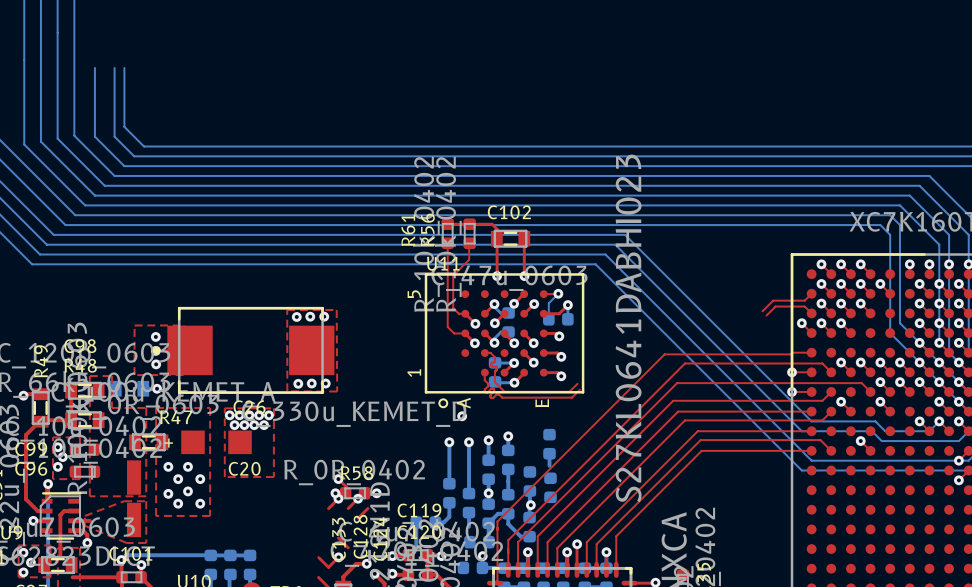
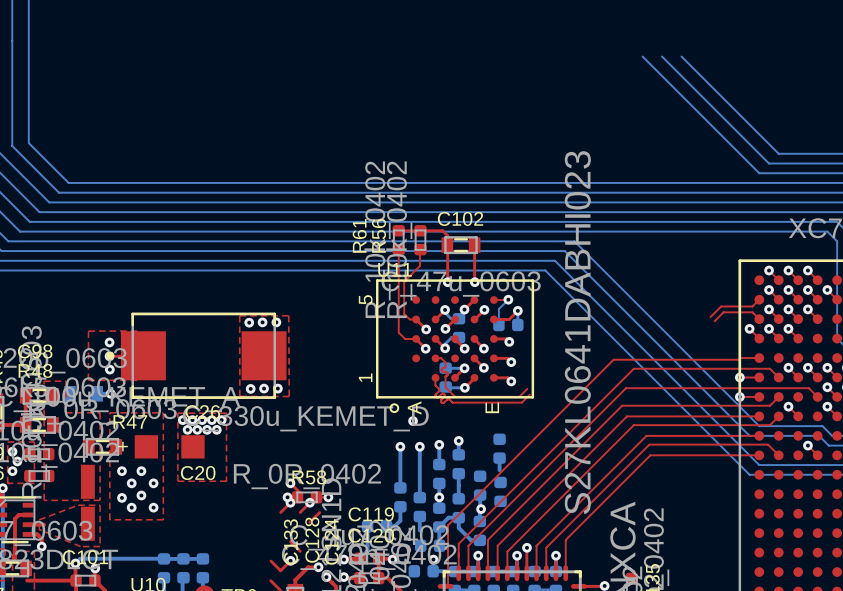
bottom track: (94, 67) (94, 136) (124, 166) (811, 166) -> (642, 56) (759, 173)
bottom track: (114, 67) (114, 136) (134, 156) (821, 156) -> (662, 56) (769, 163)
bottom track: (124, 67) (124, 126) (144, 146) (831, 146) -> (681, 56) (778, 153)

